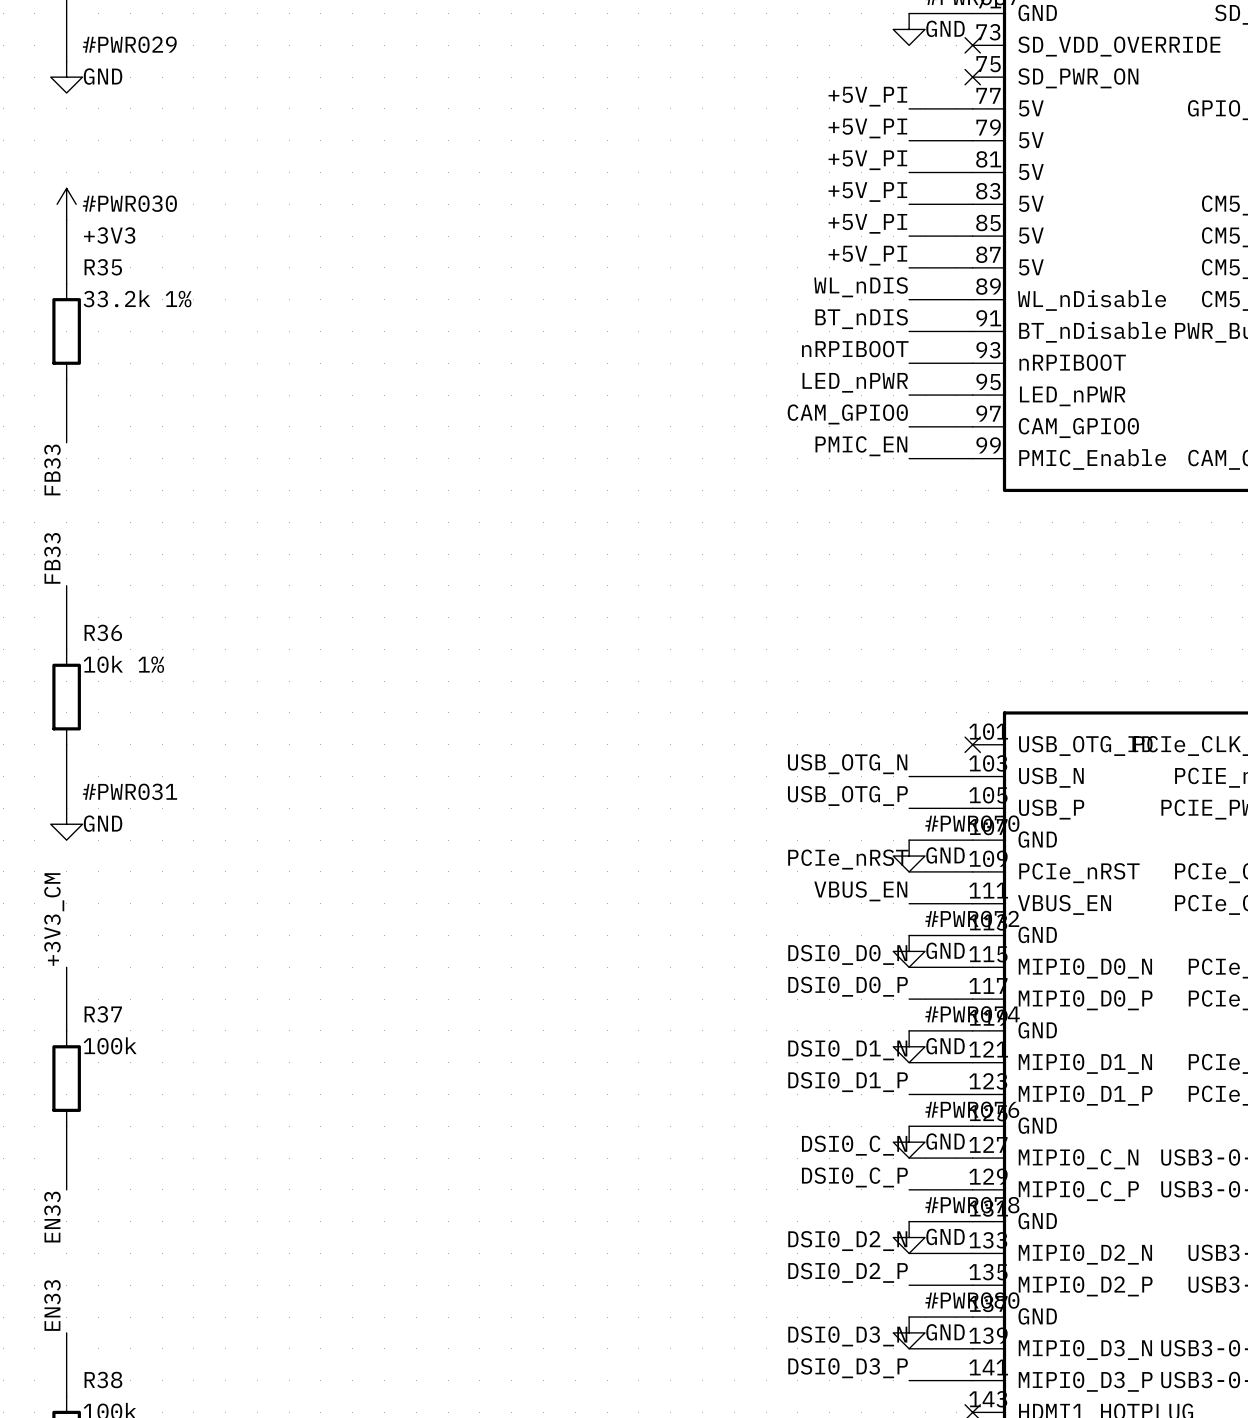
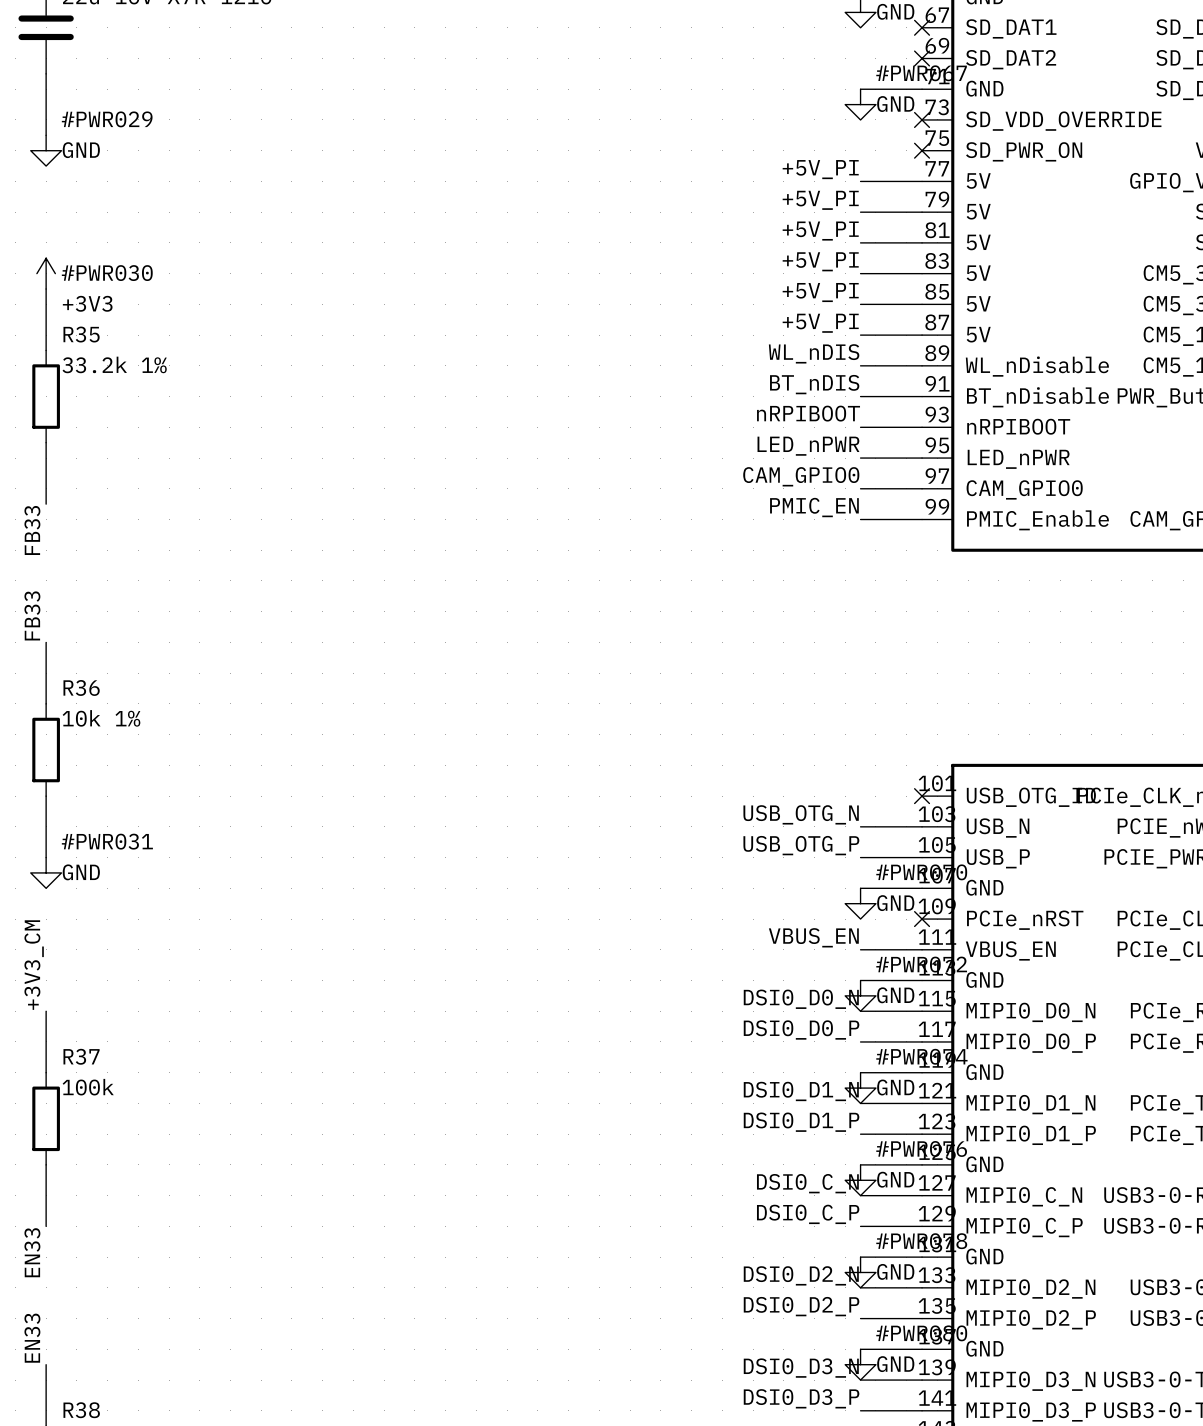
label: PCIe_nRST (848, 859) -> none
wire: (909, 871) (972, 871) -> none
no-connect mark: none -> (922, 919)

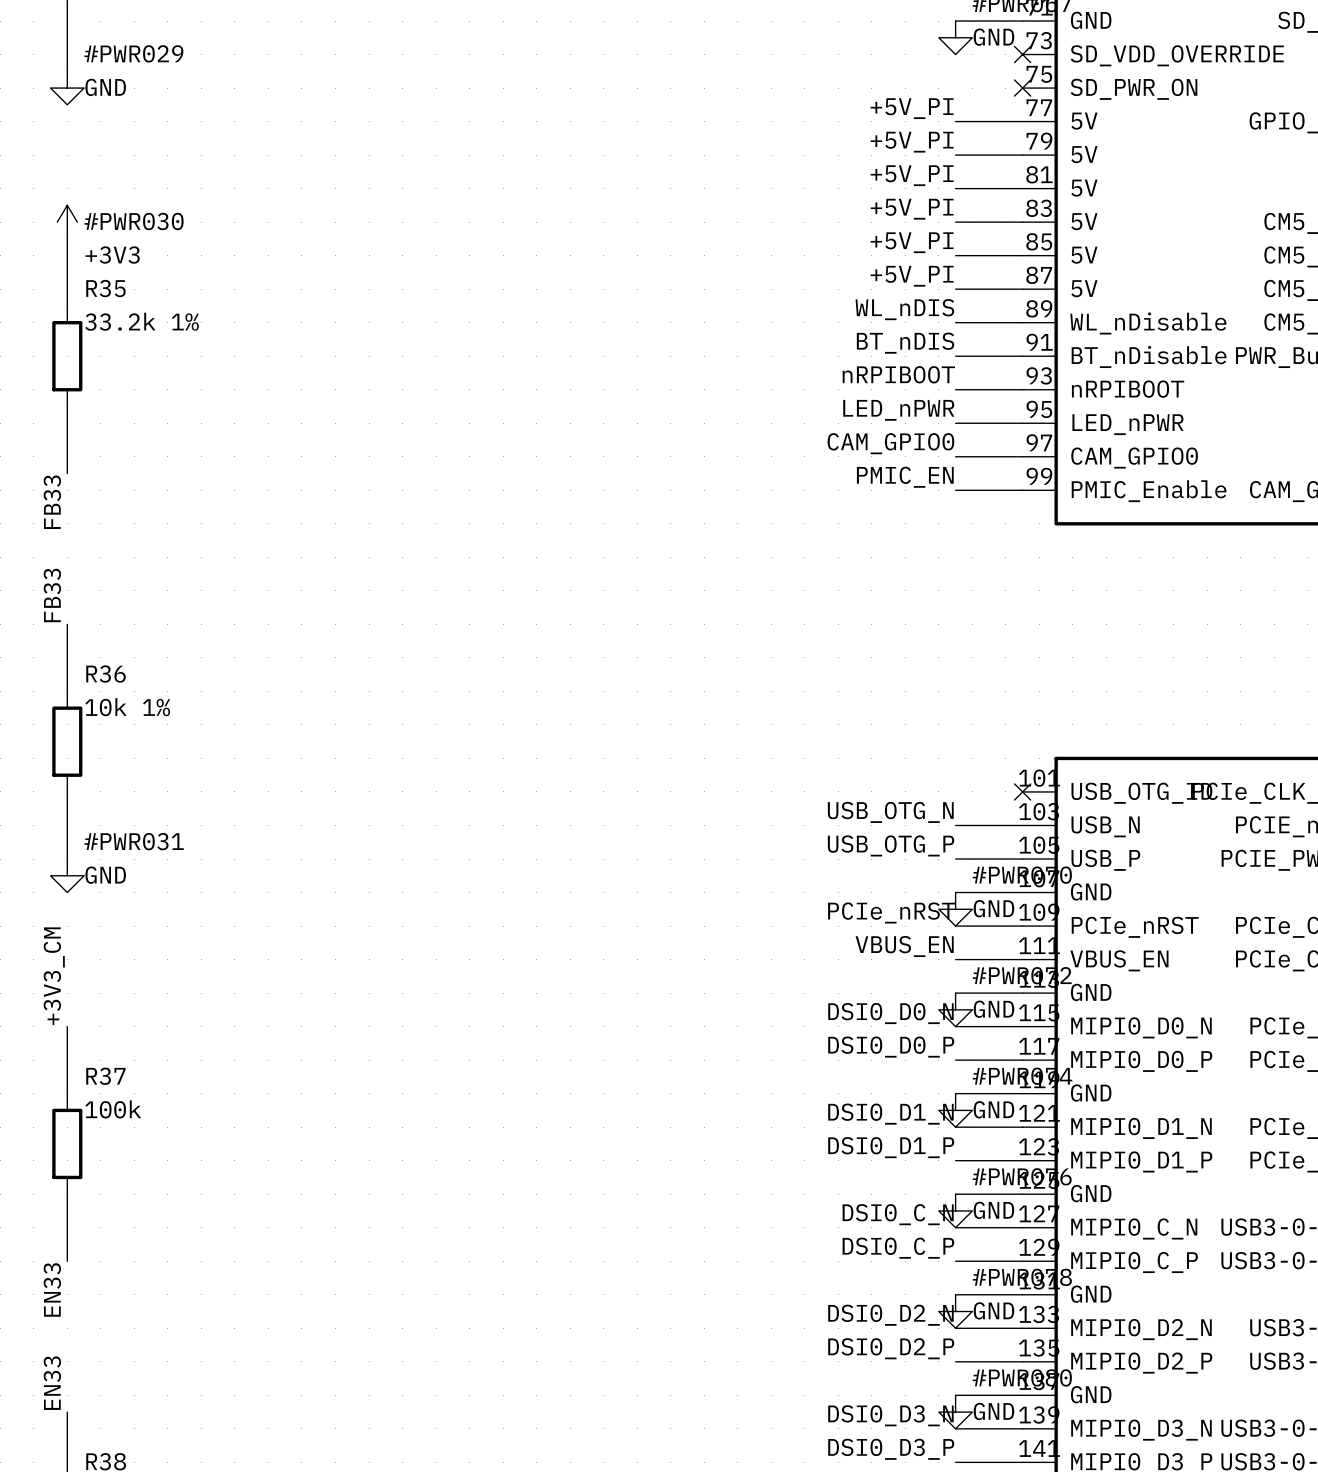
label: none -> PCIe_nRST (891, 912)
wire: none -> (955, 926) (1022, 926)
no-connect mark: (922, 919) -> none

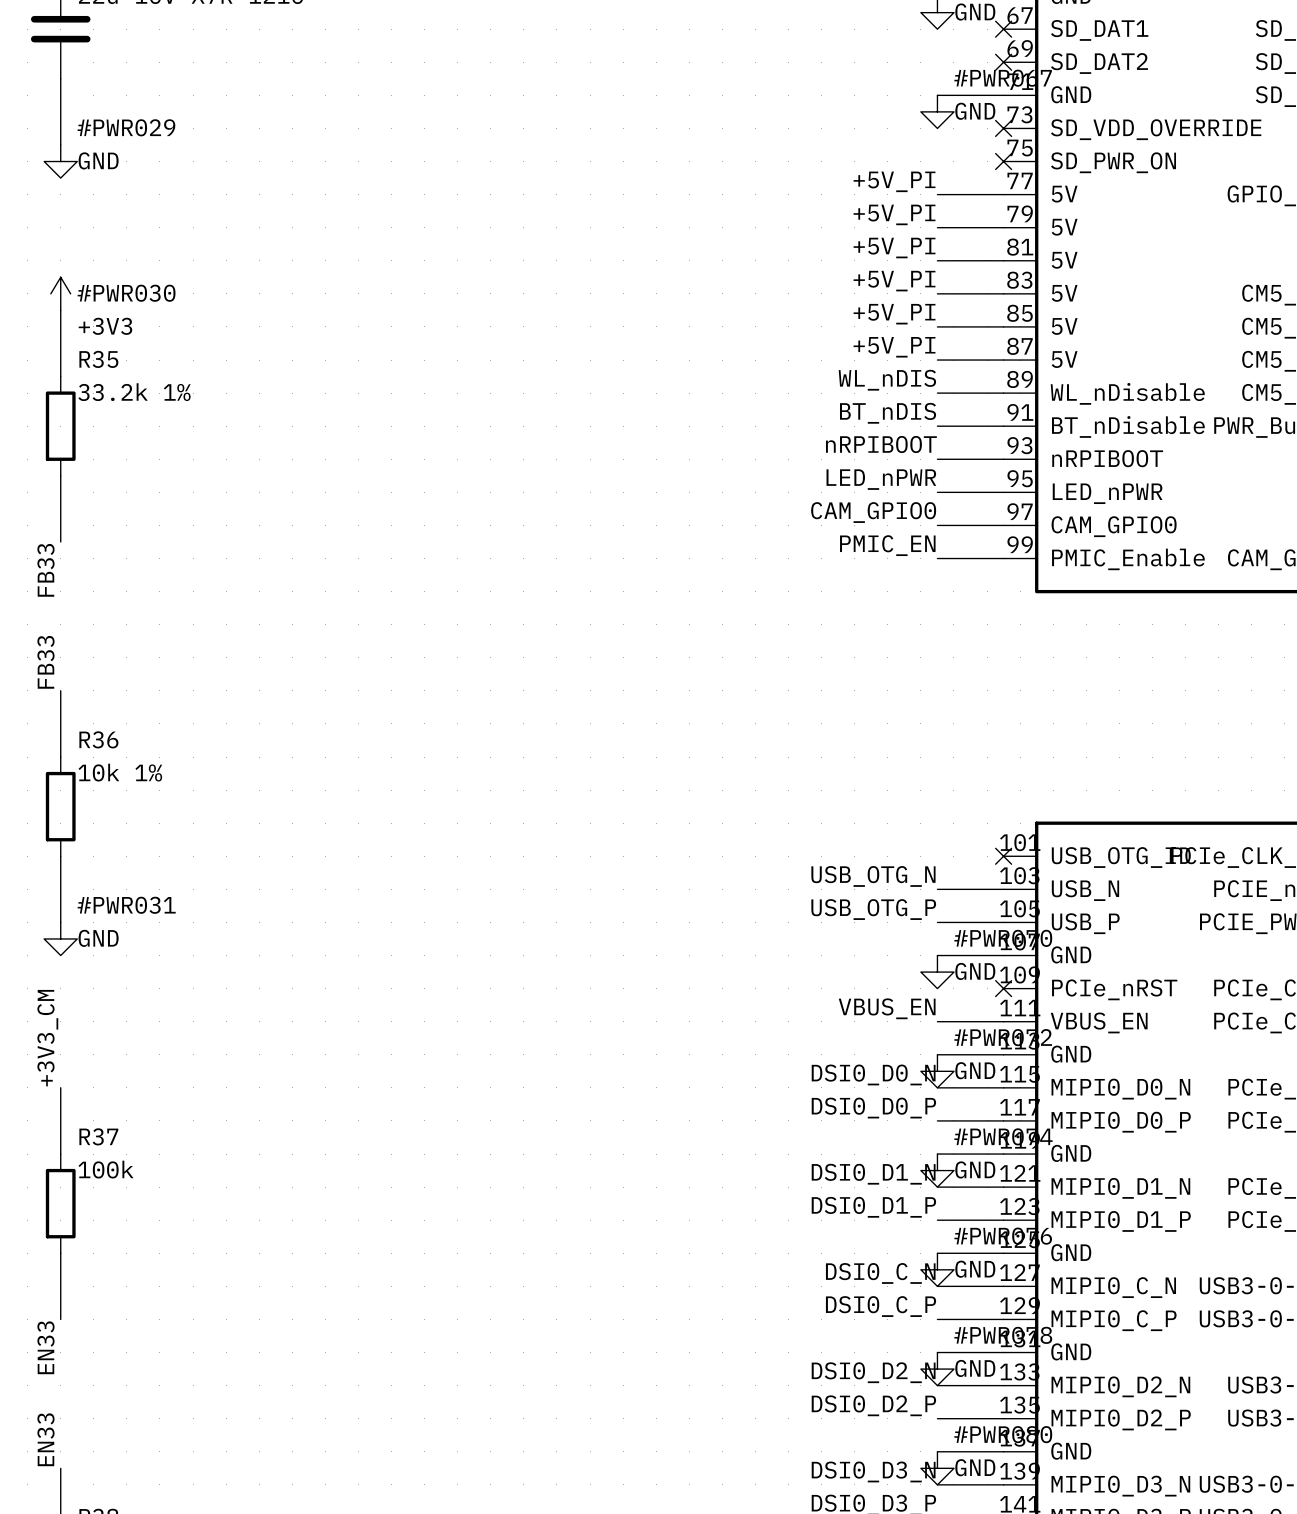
label: PCIe_nRST (891, 912) -> none
wire: (955, 926) (1022, 926) -> none
no-connect mark: none -> (1003, 988)

